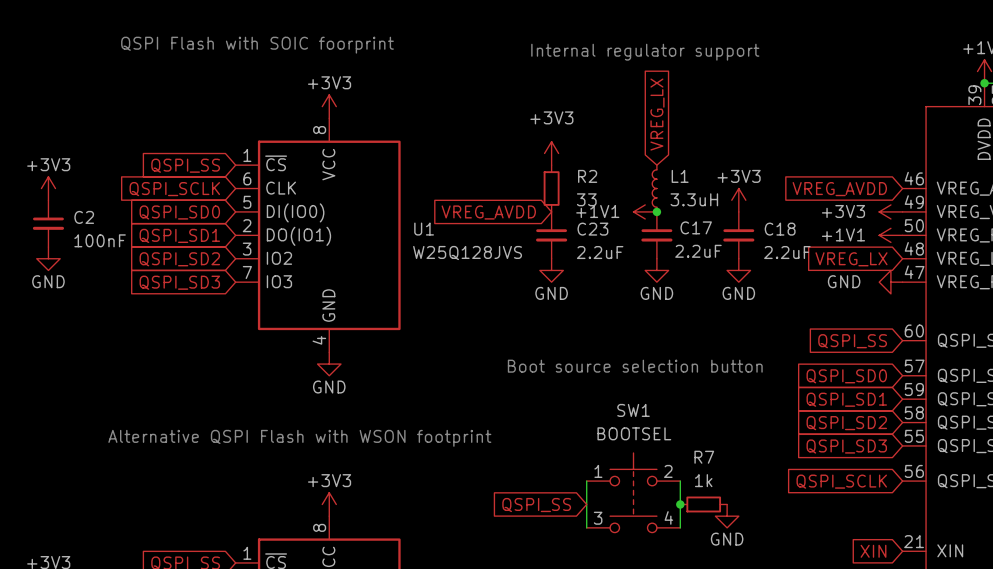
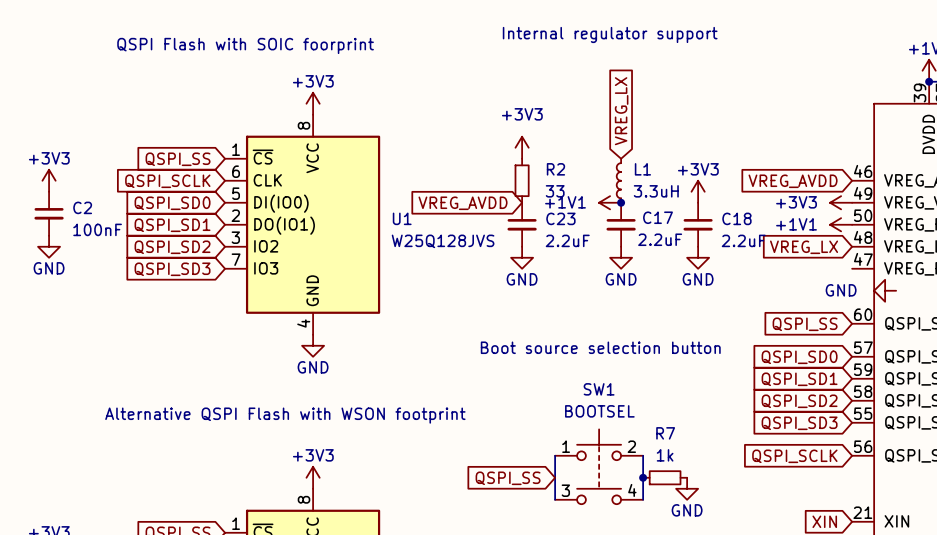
text position: Internal regulator support (645, 52) -> Internal regulator support (610, 34)
power symbol position: GND (890, 282) -> GND (885, 290)

